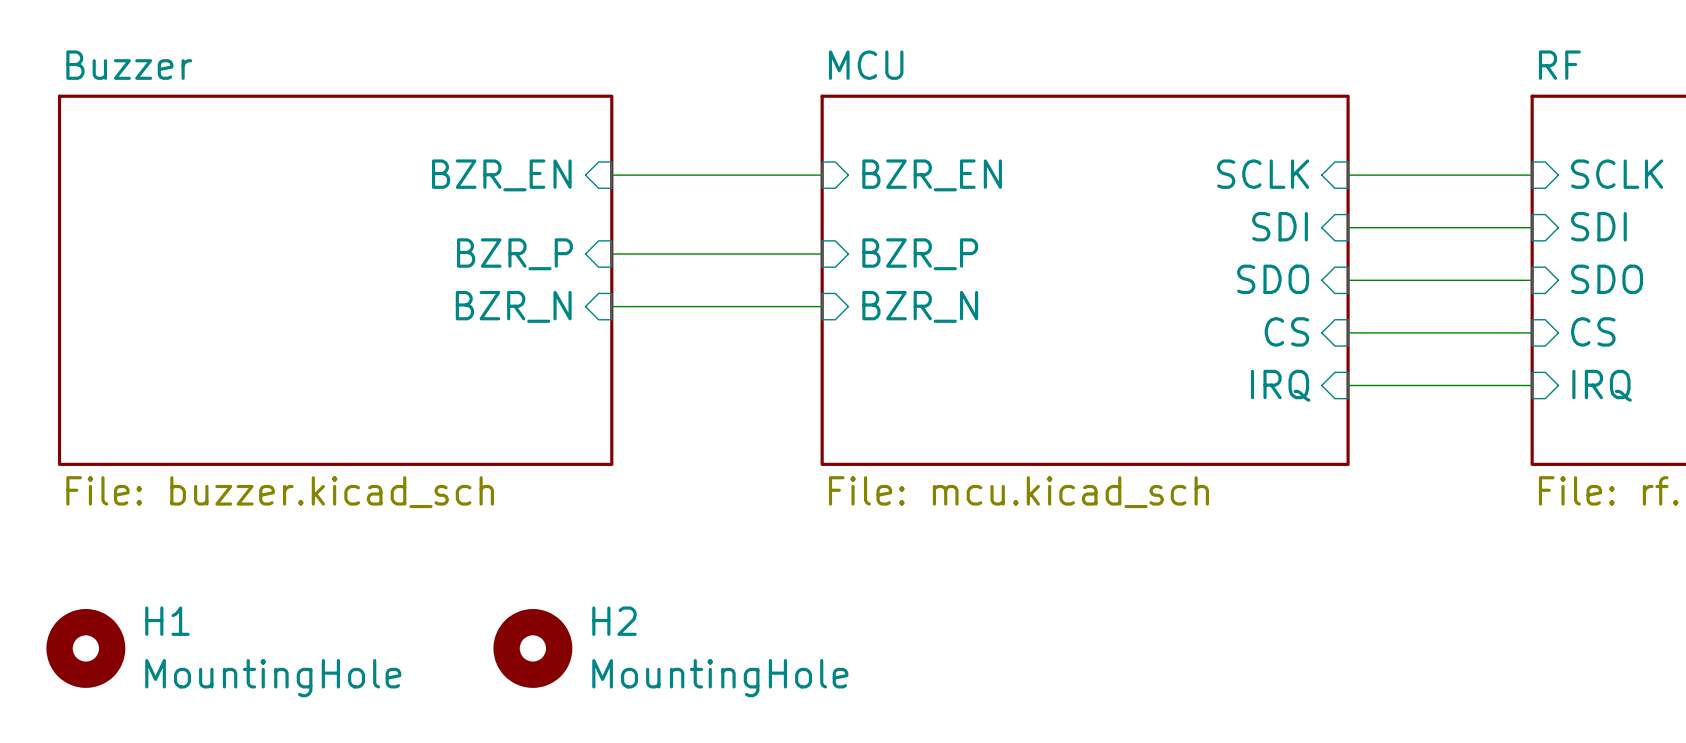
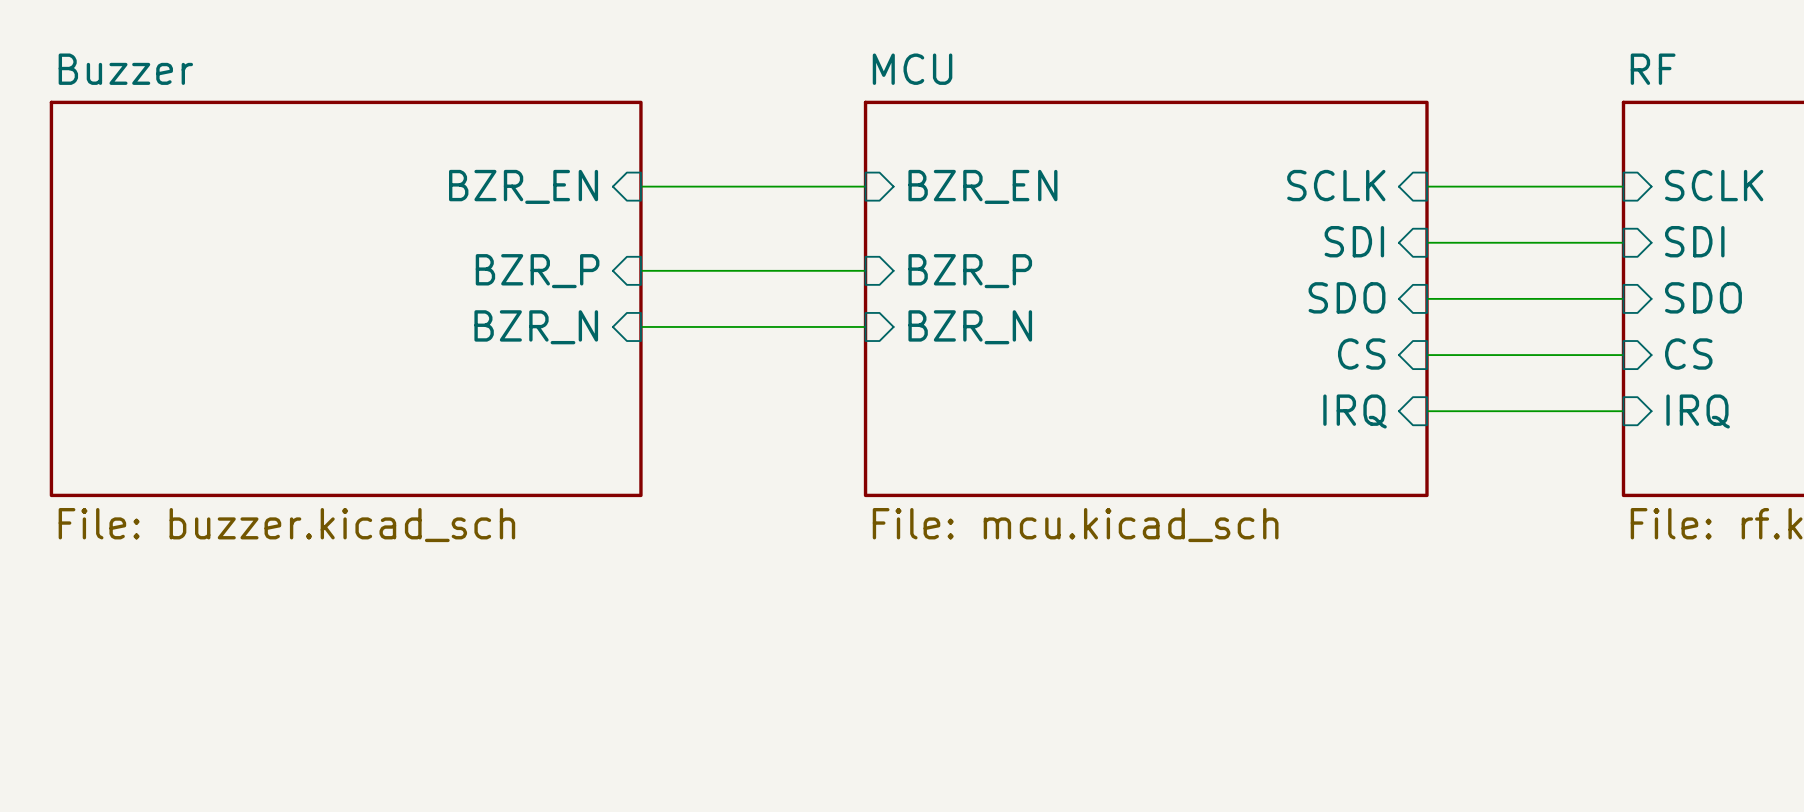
H1: MountingHole (85, 648) -> none
H2: MountingHole (532, 648) -> none

